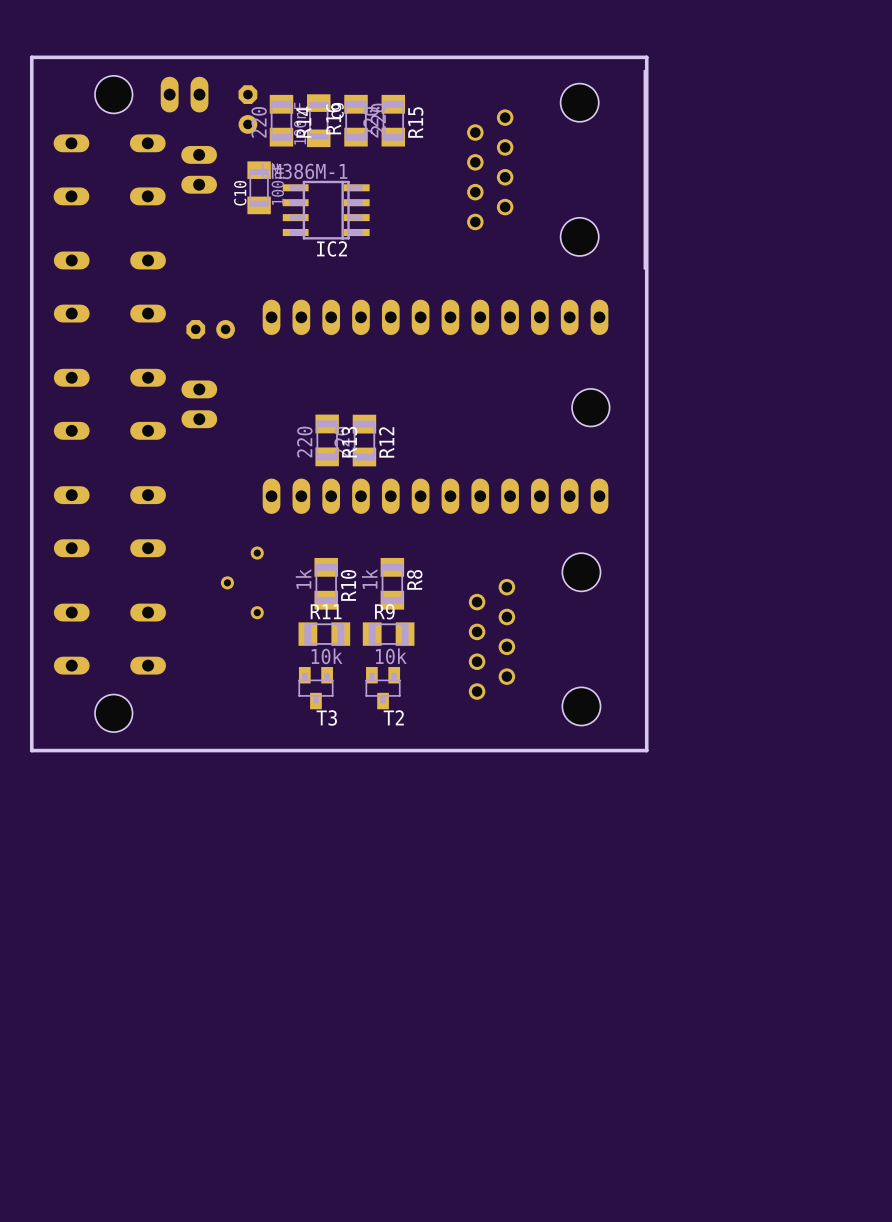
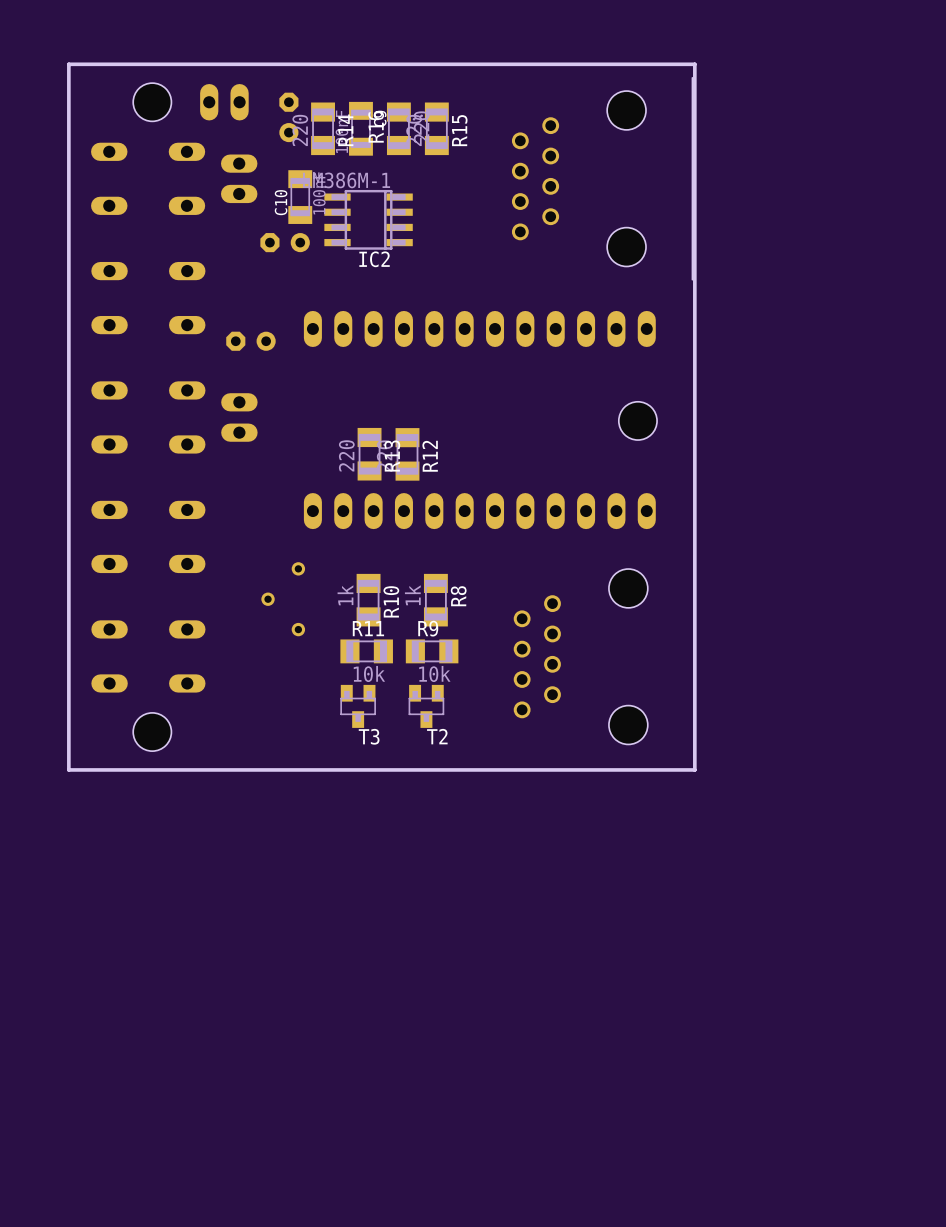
part: none -> (285, 242)

